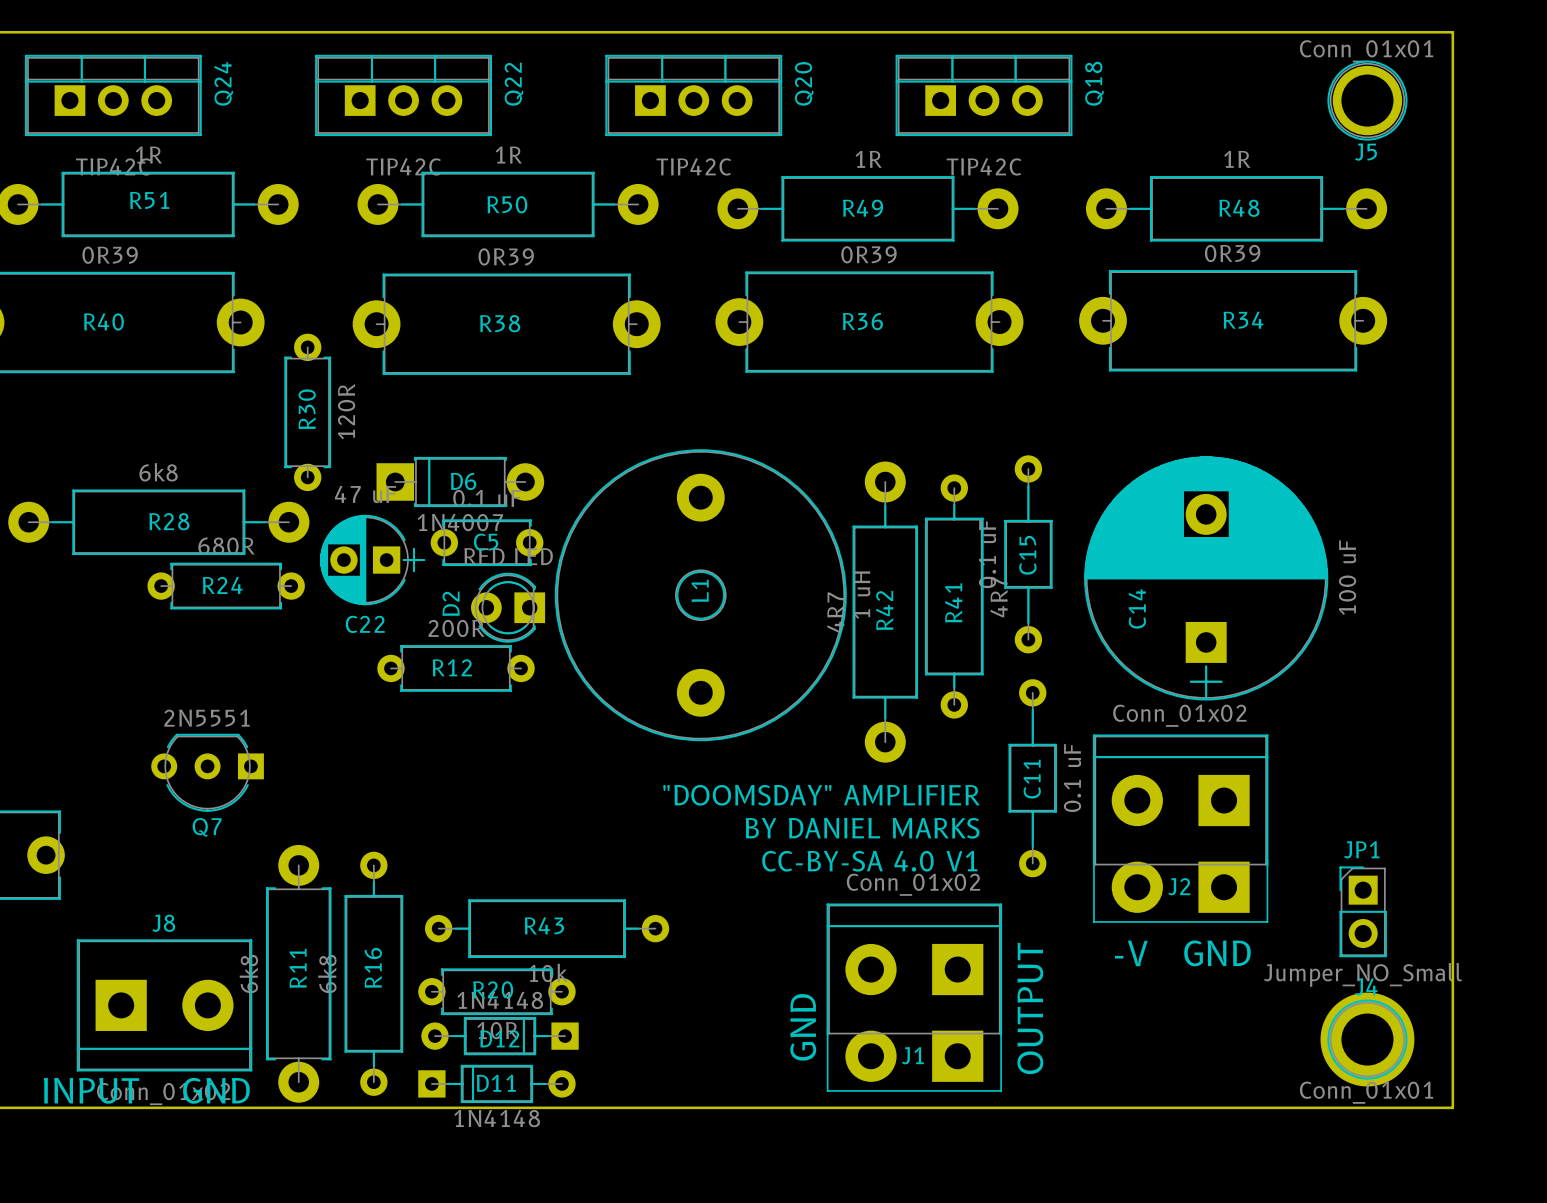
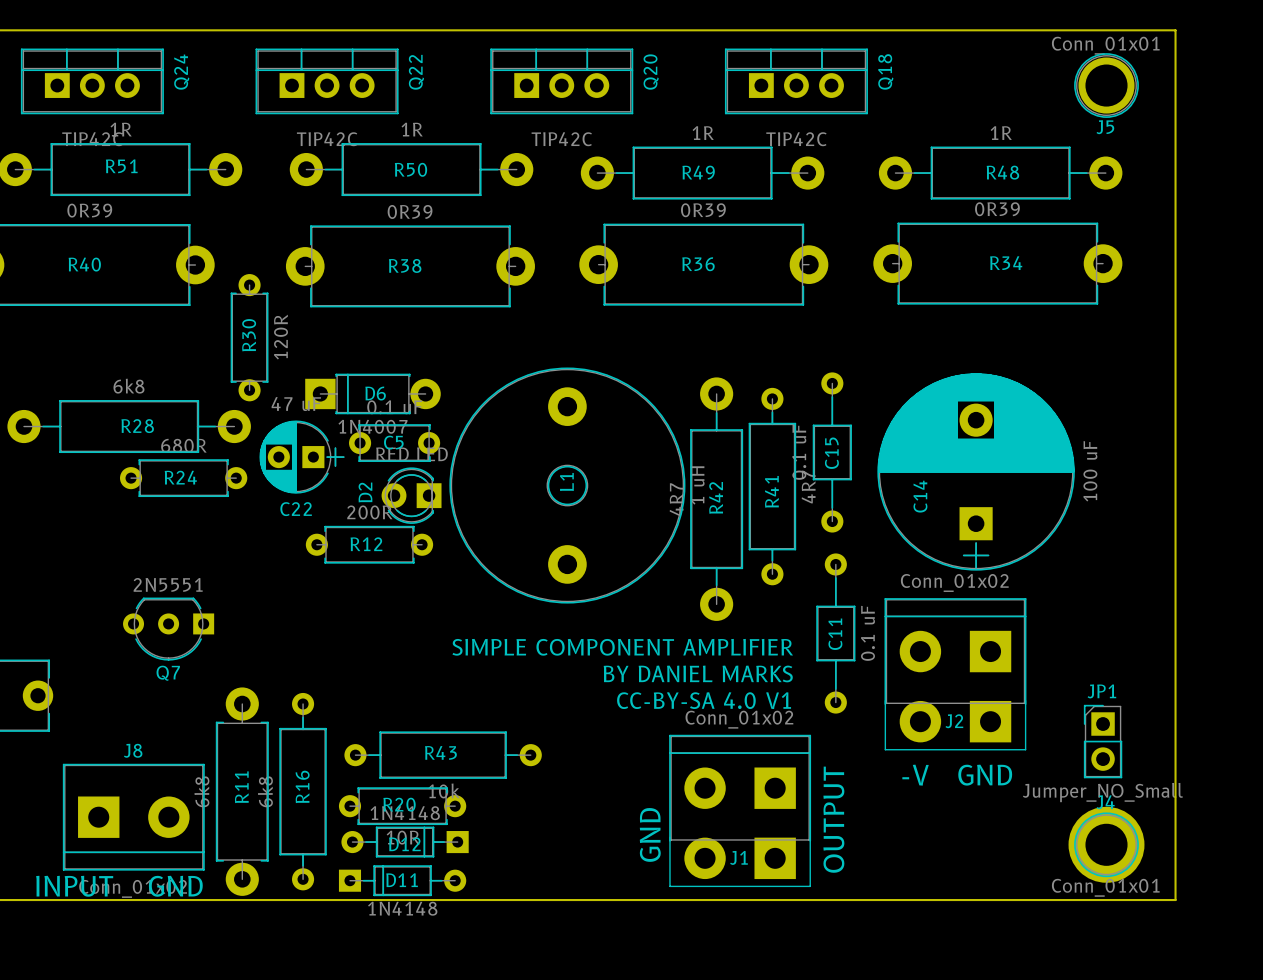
text: "DOOMSDAY" AMPLIFIER (821, 795) -> SIMPLE COMPONENT AMPLIFIER (622, 647)

